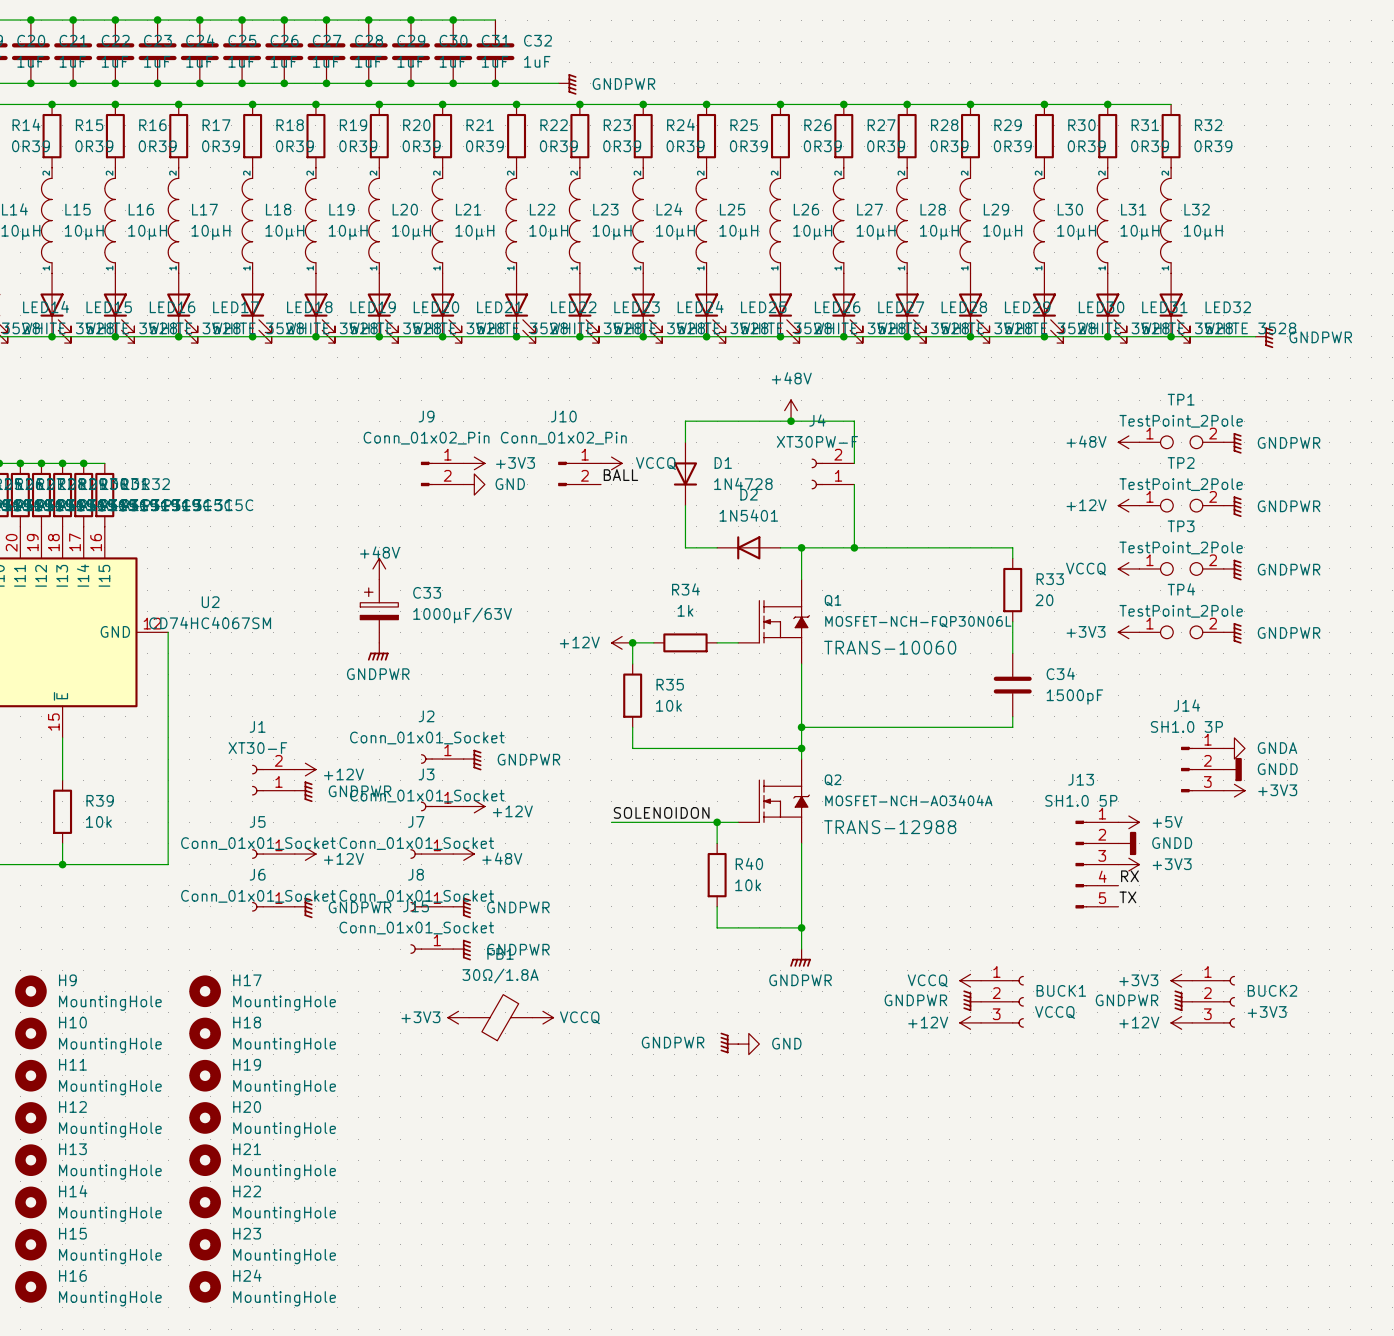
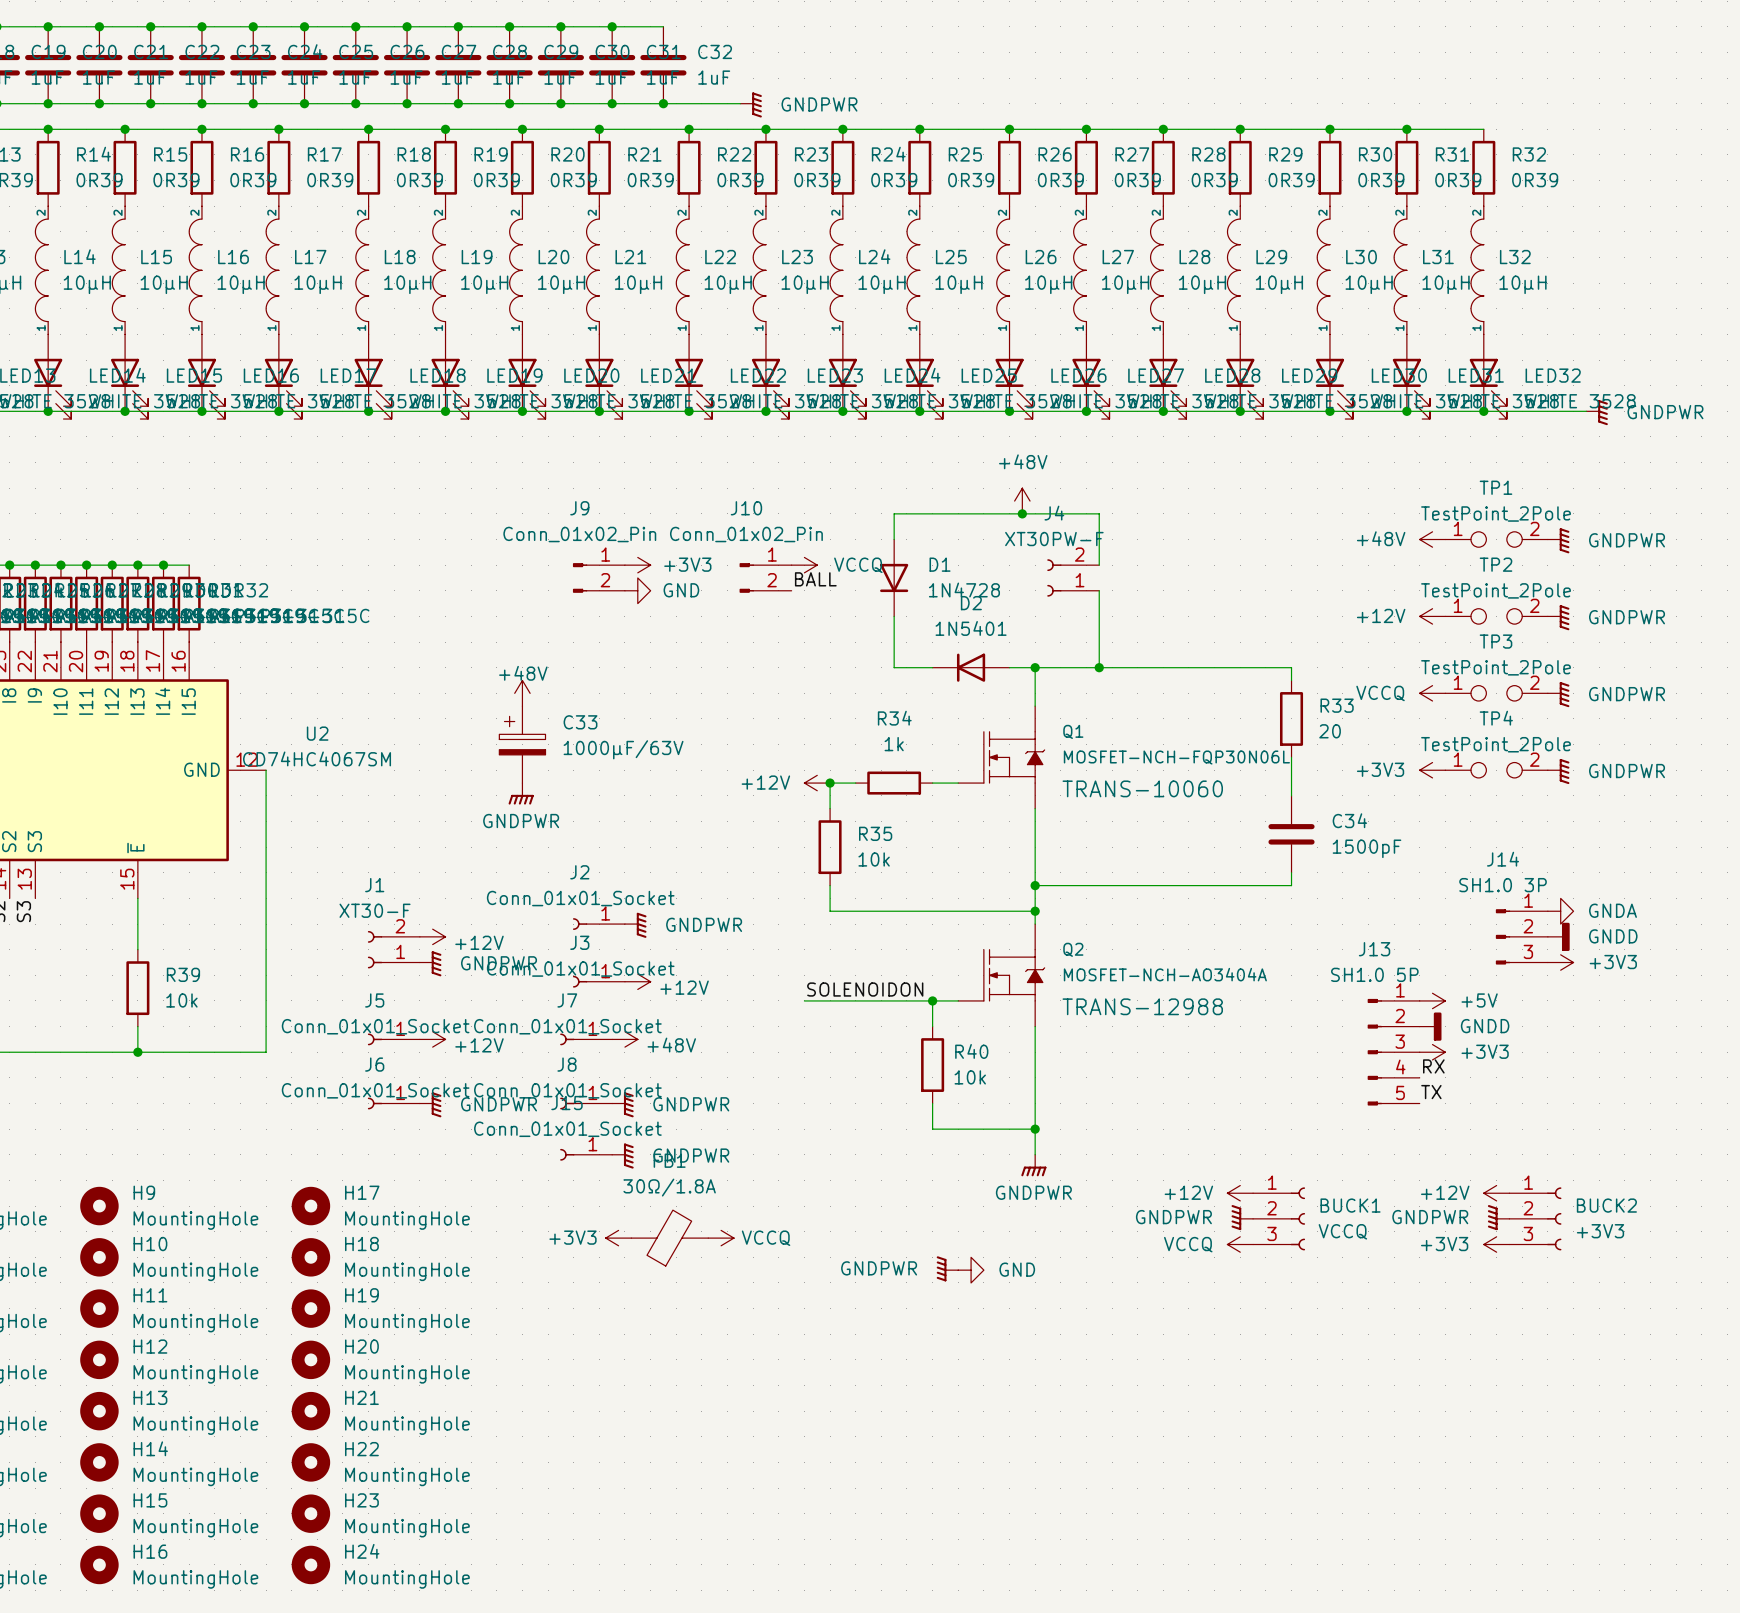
power symbol: VCCQ (970, 980) -> +12V (1240, 1193)
power symbol: +3V3 (1181, 980) -> +12V (1496, 1193)
power symbol: +12V (970, 1022) -> VCCQ (1240, 1244)
power symbol: +12V (1181, 1022) -> +3V3 (1496, 1244)

